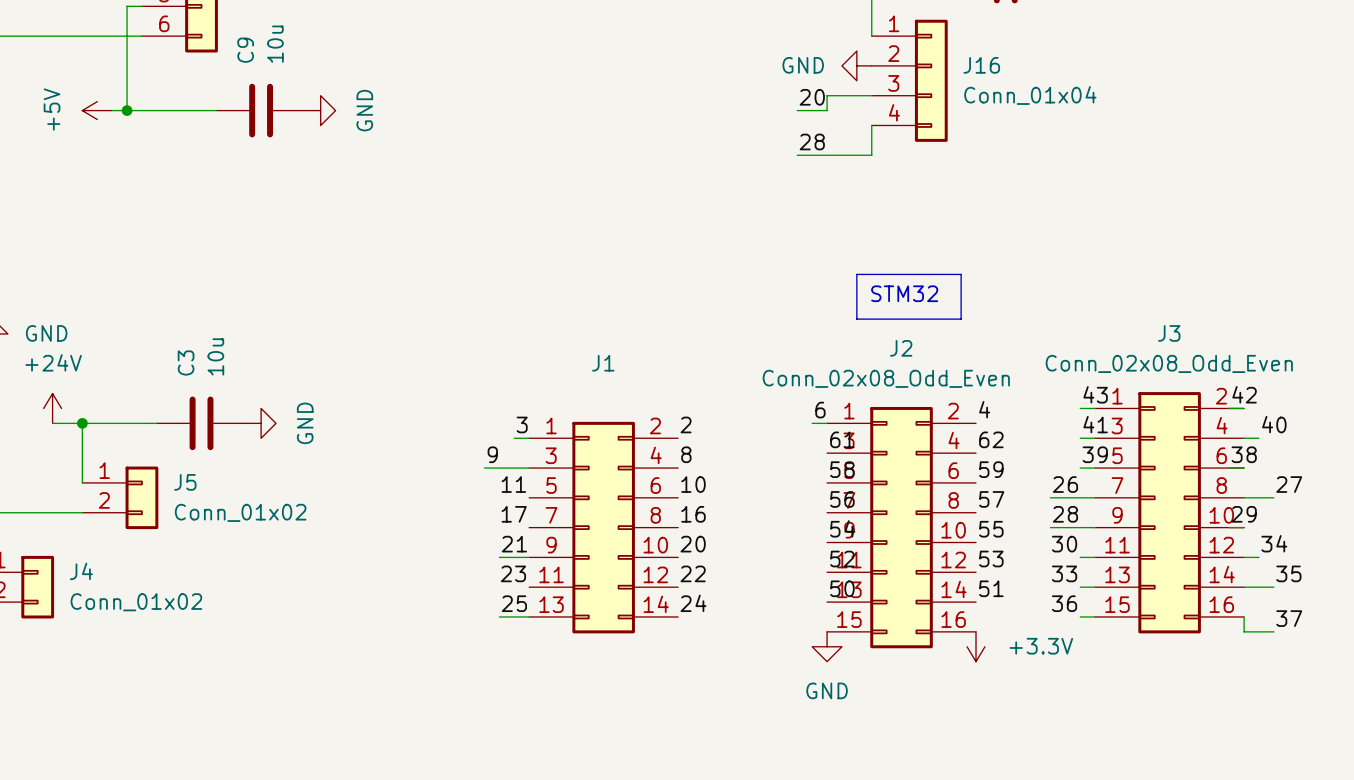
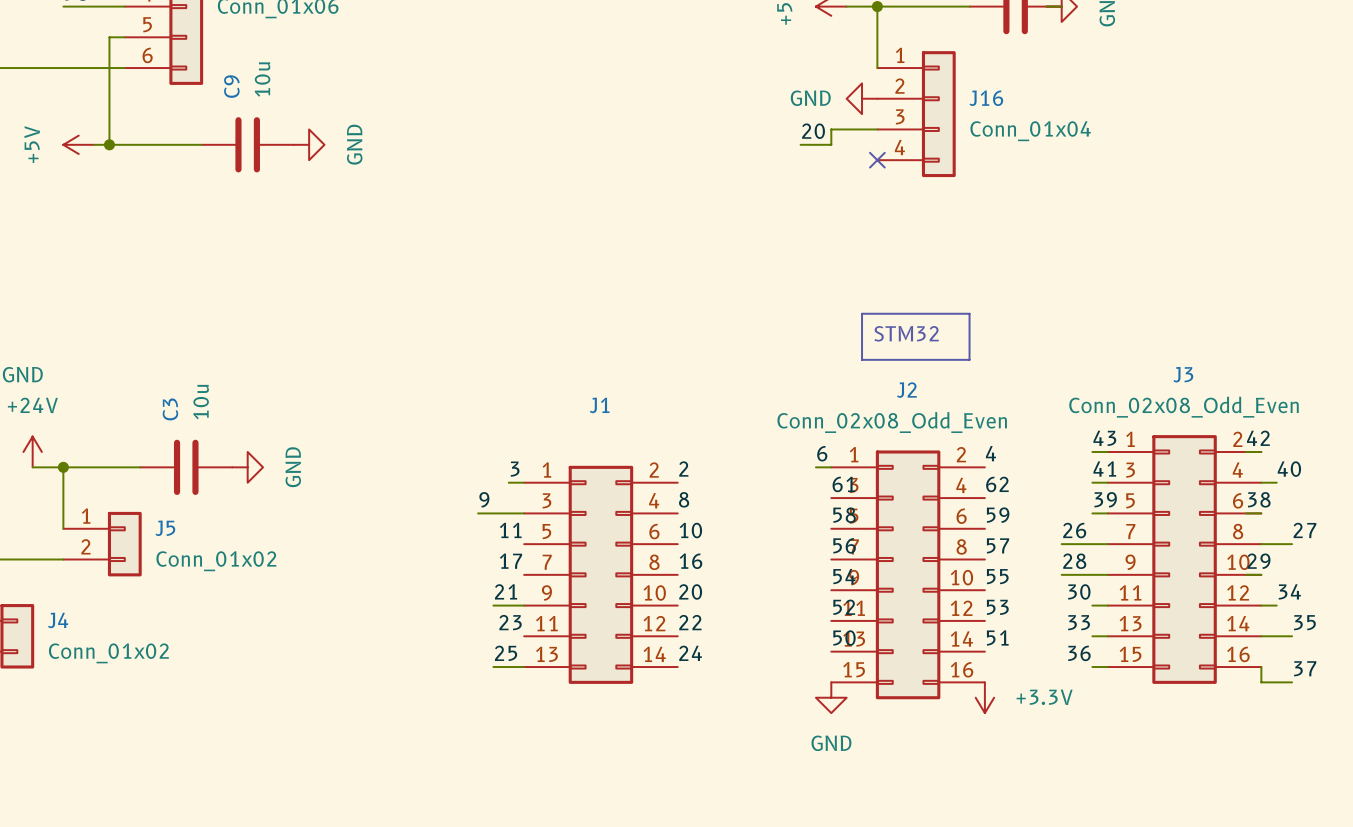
wire: (871, 125) (871, 155) (797, 155) -> none
no-connect mark: none -> (877, 160)
label: 28 (812, 141) -> none

